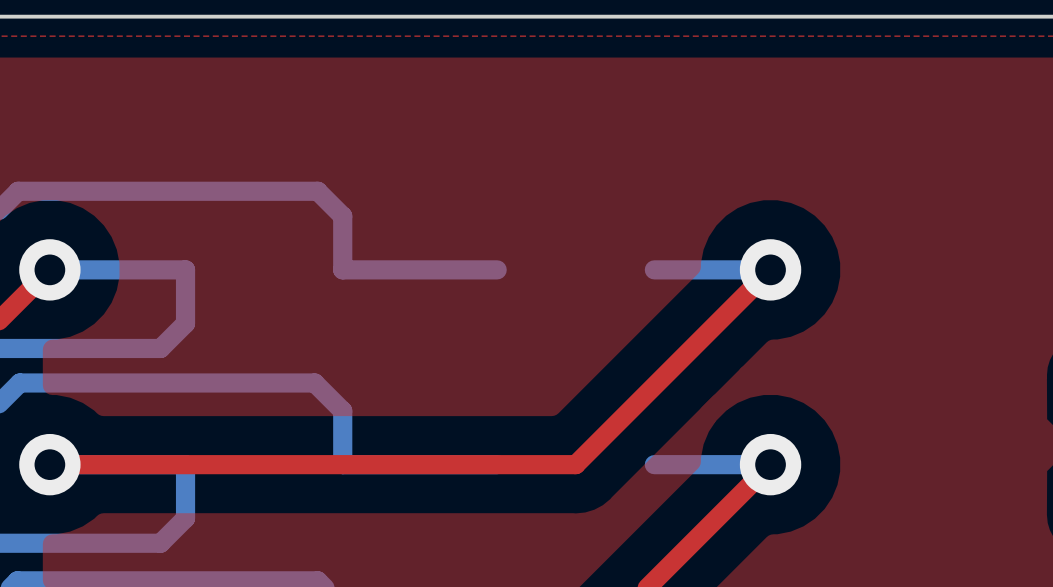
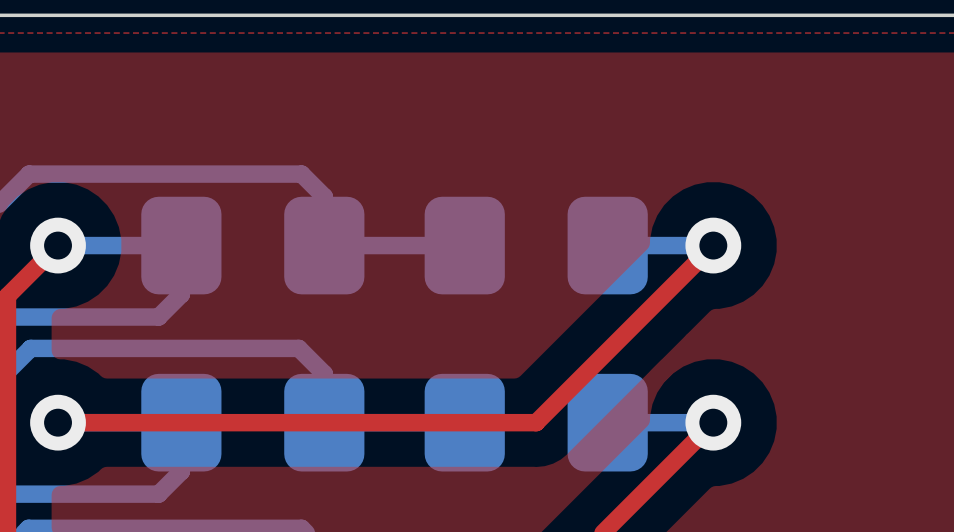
part: none -> (252, 245)
part: none -> (536, 245)
part: none -> (252, 422)
part: none -> (536, 422)

